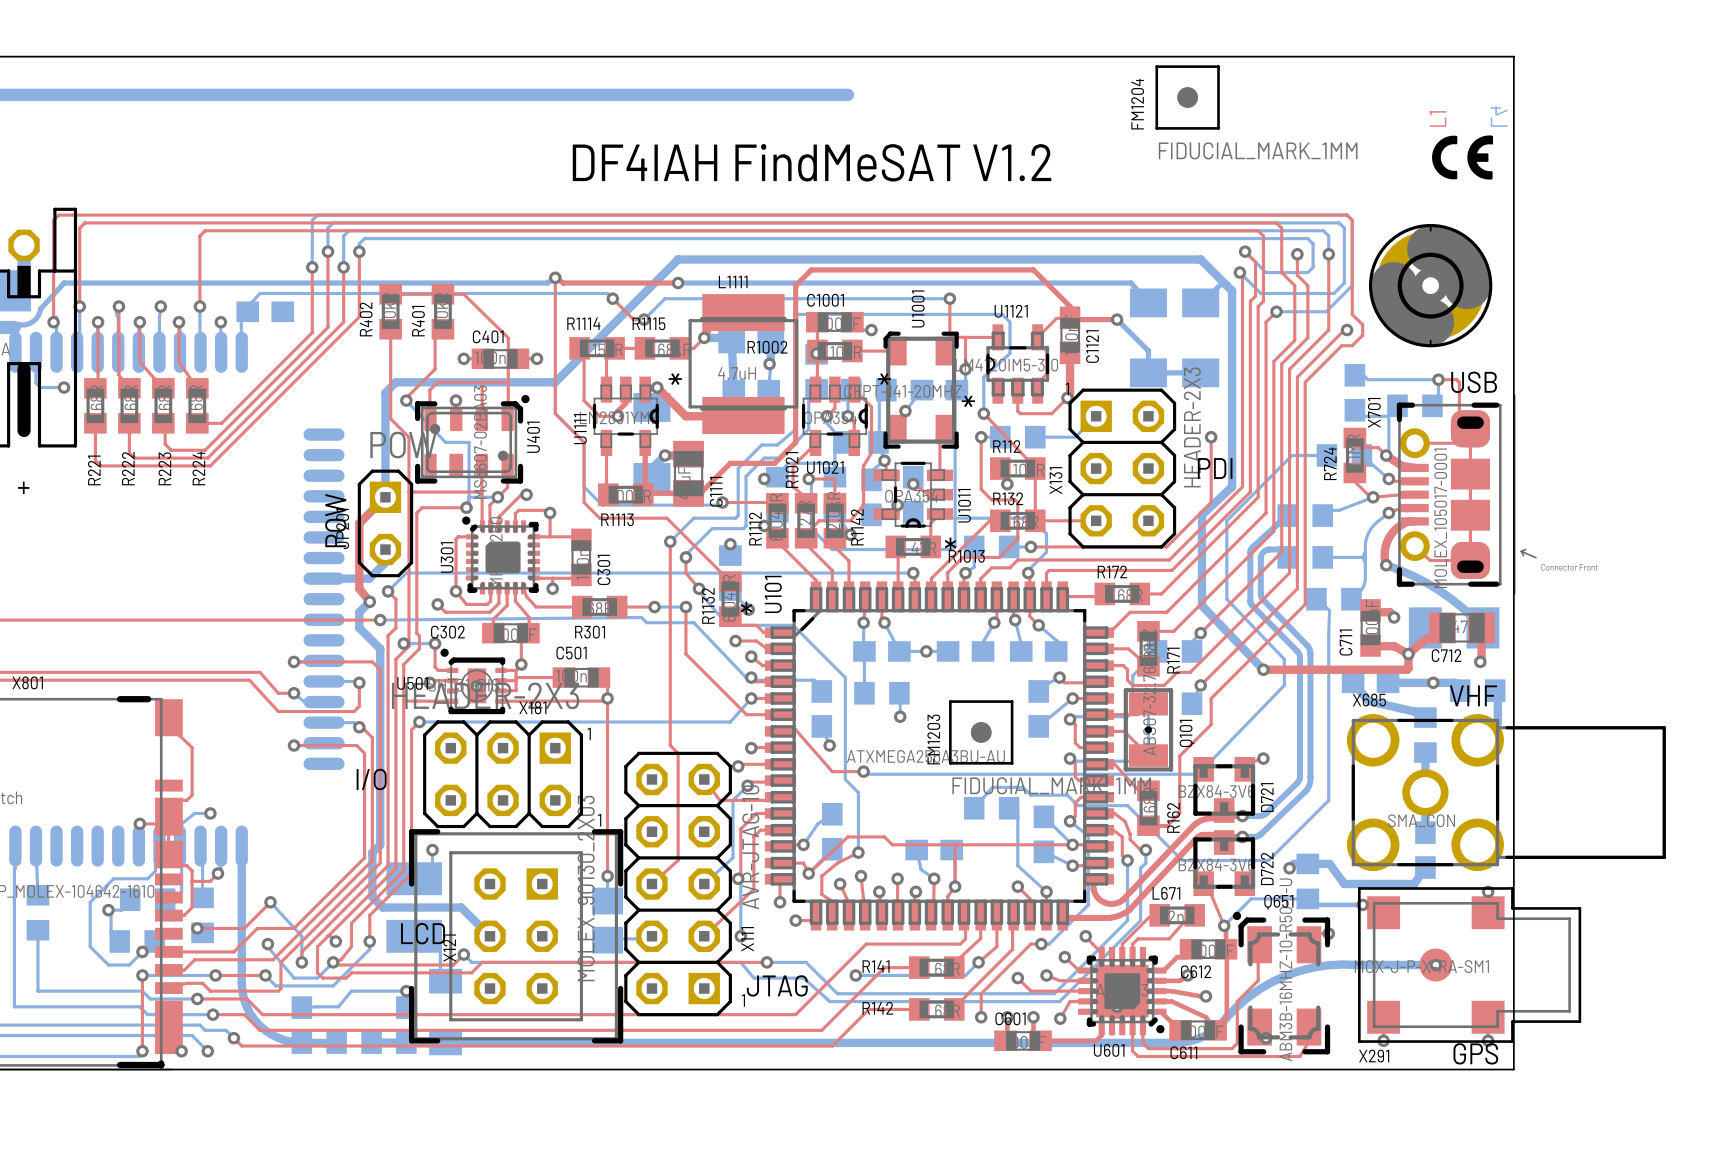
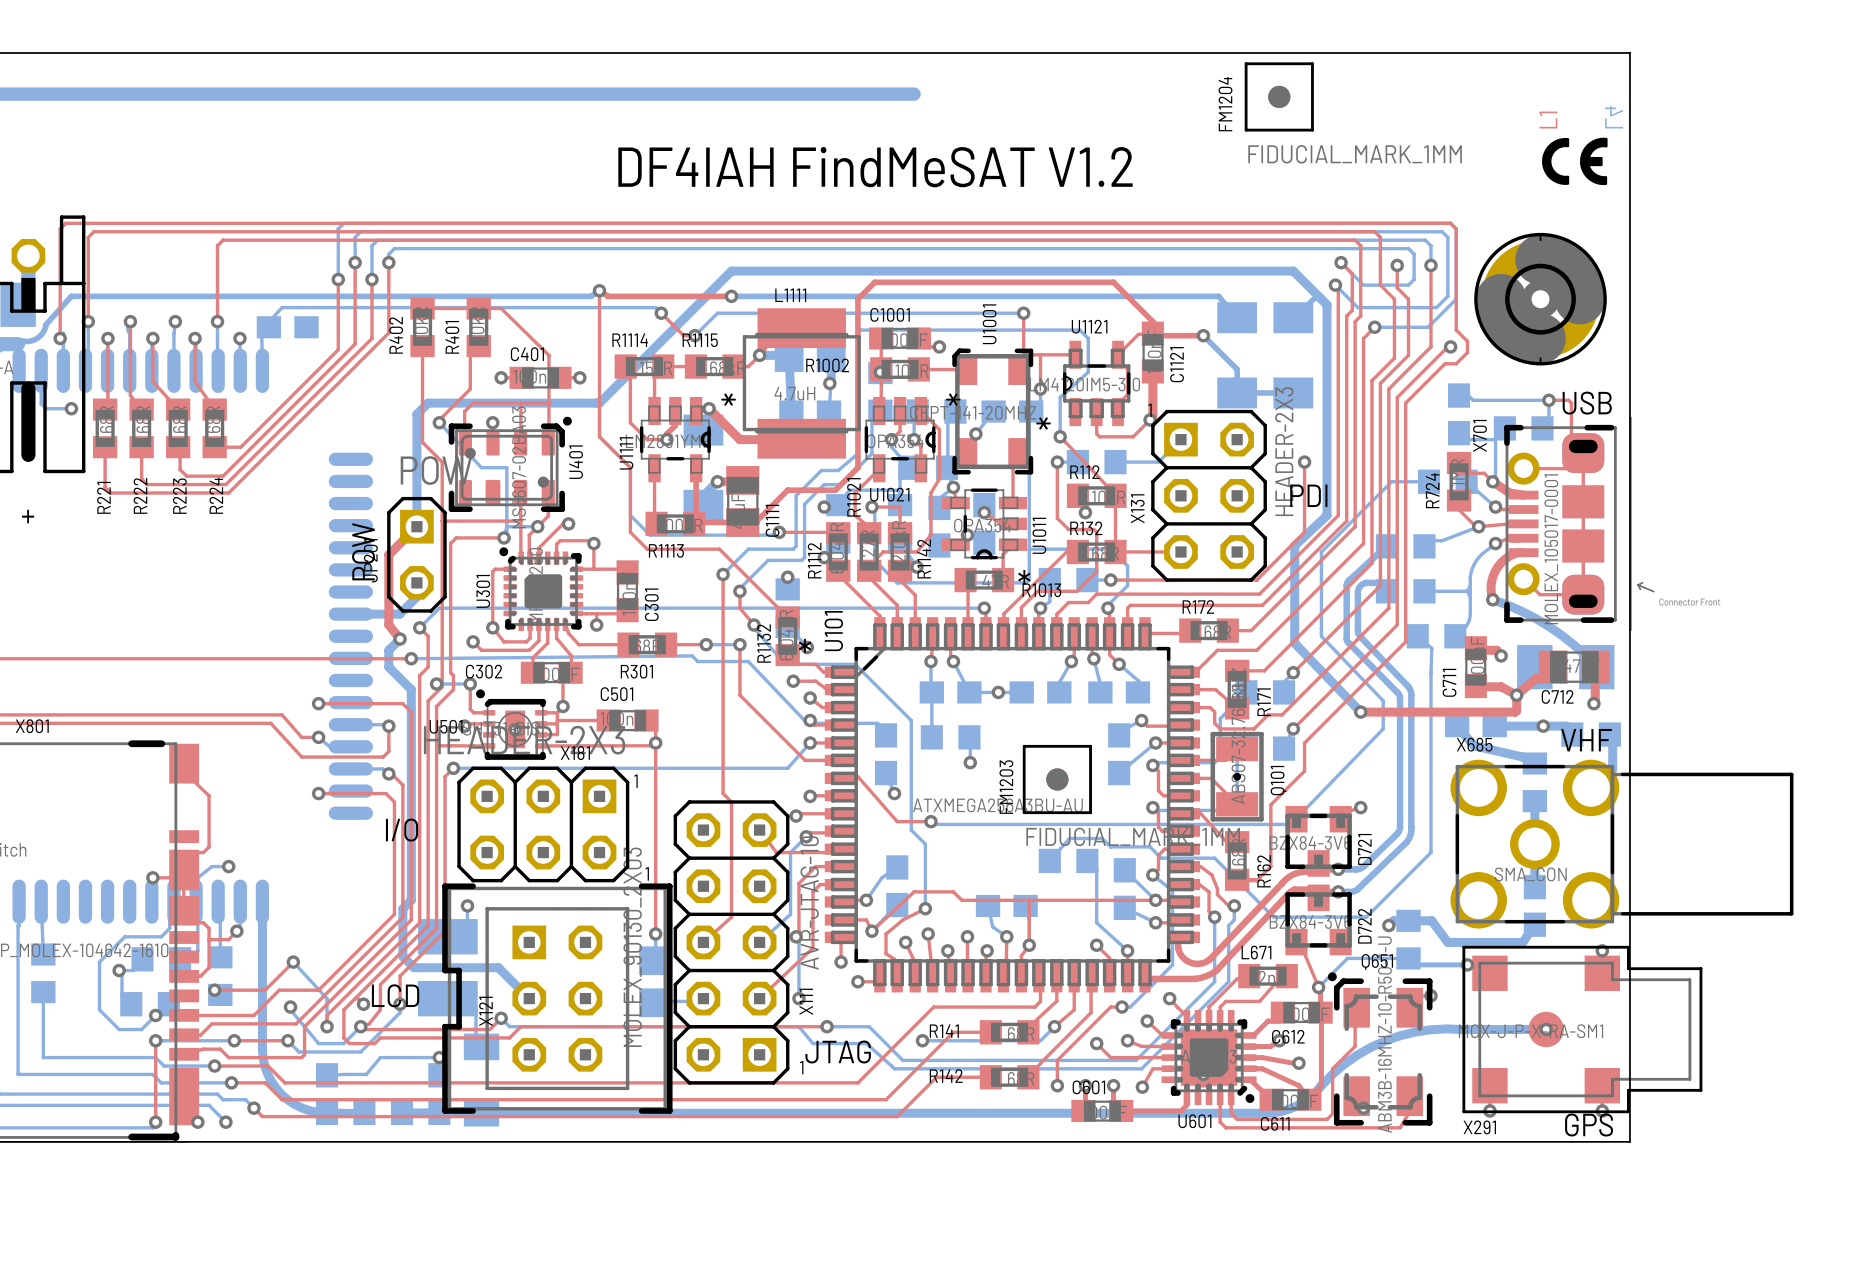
X121 footprint: [408, 829, 624, 1044] -> [442, 883, 673, 1114]
text position: LCD (423, 933) -> LCD (395, 995)

